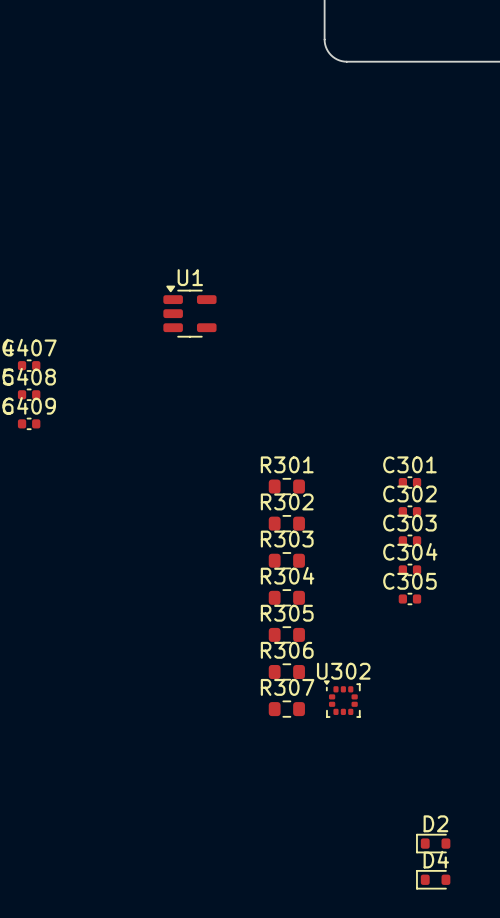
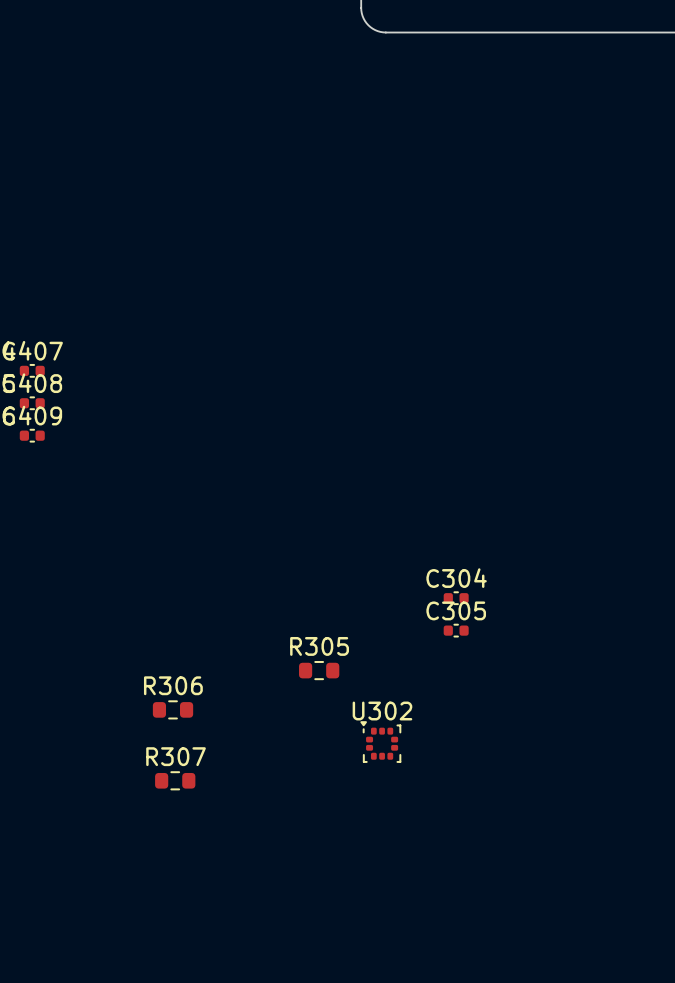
U1: (189, 311) -> none
C301: (409, 482) -> none
R301: (286, 486) -> none
C302: (409, 511) -> none
R302: (286, 523) -> none
C303: (409, 540) -> none
R303: (286, 560) -> none
R304: (286, 597) -> none
R306 position: (286, 672) -> (173, 709)
R307 position: (286, 709) -> (175, 780)
D2: (433, 843) -> none
D4: (433, 879) -> none

